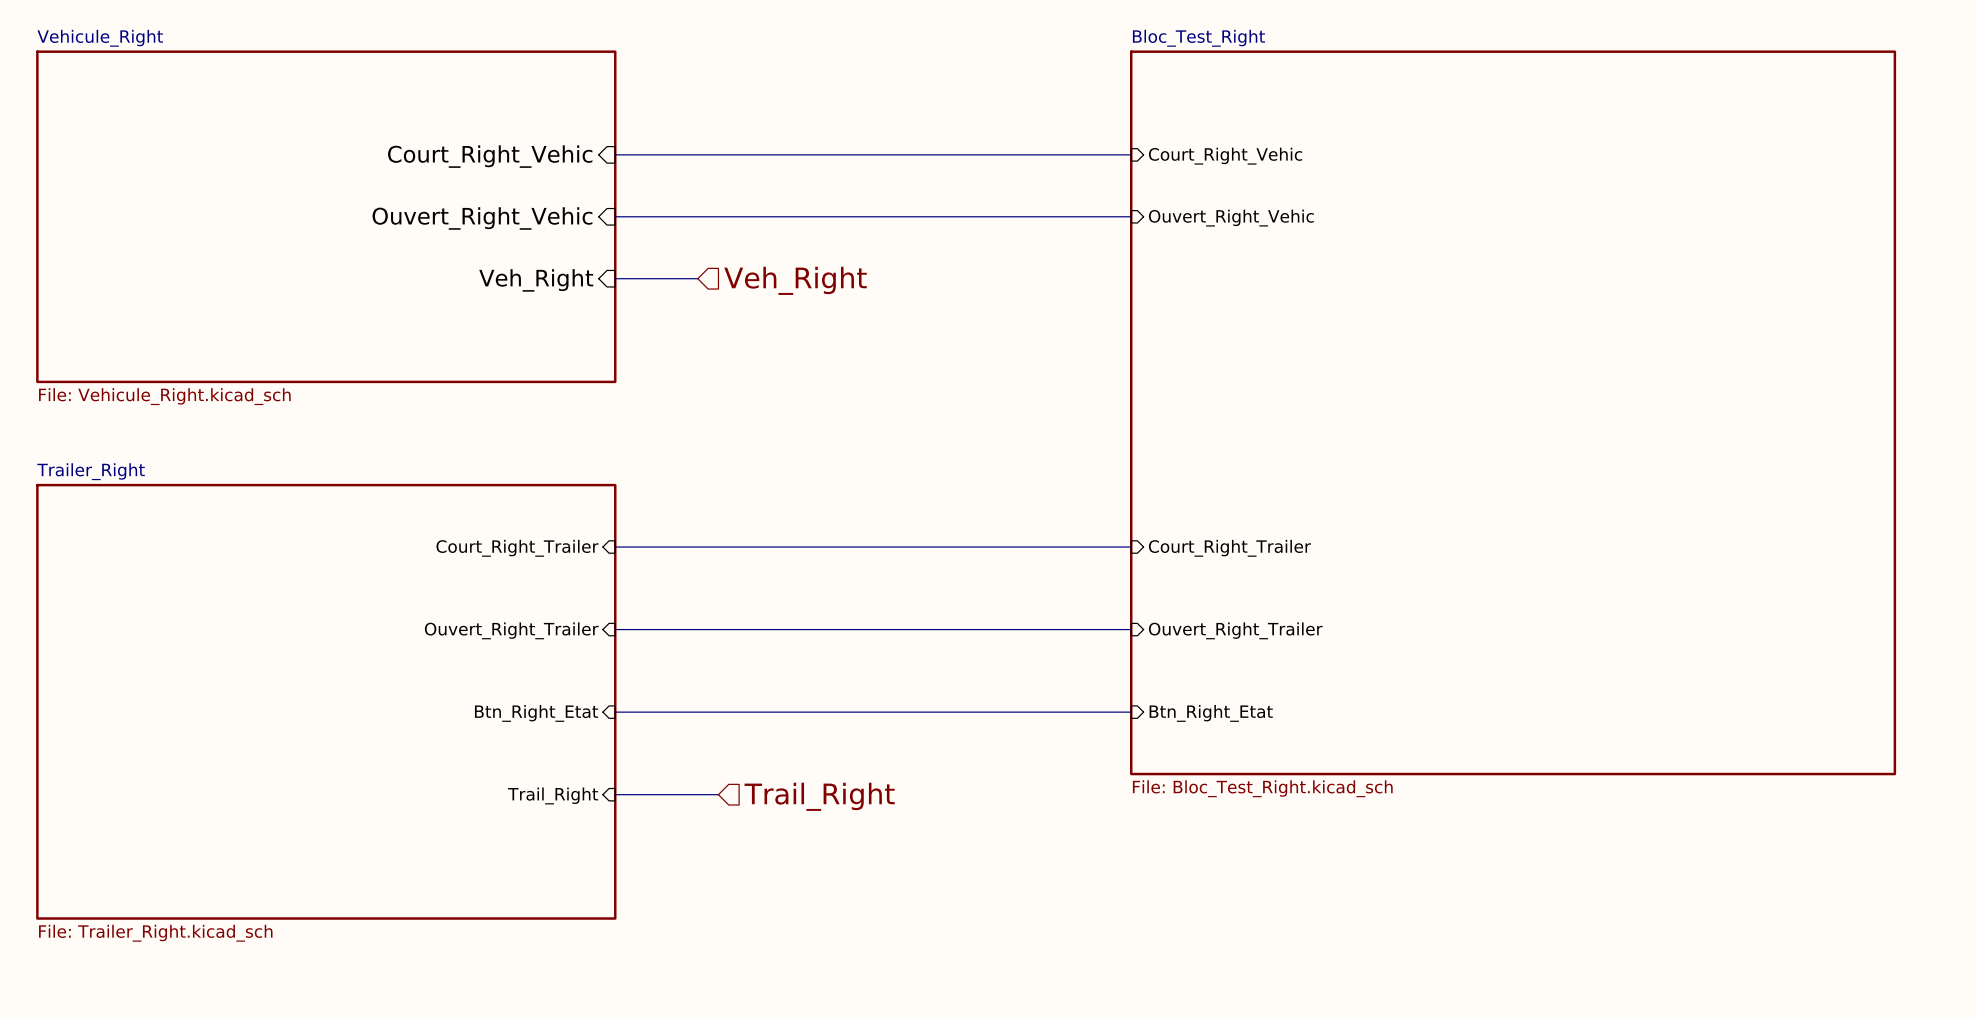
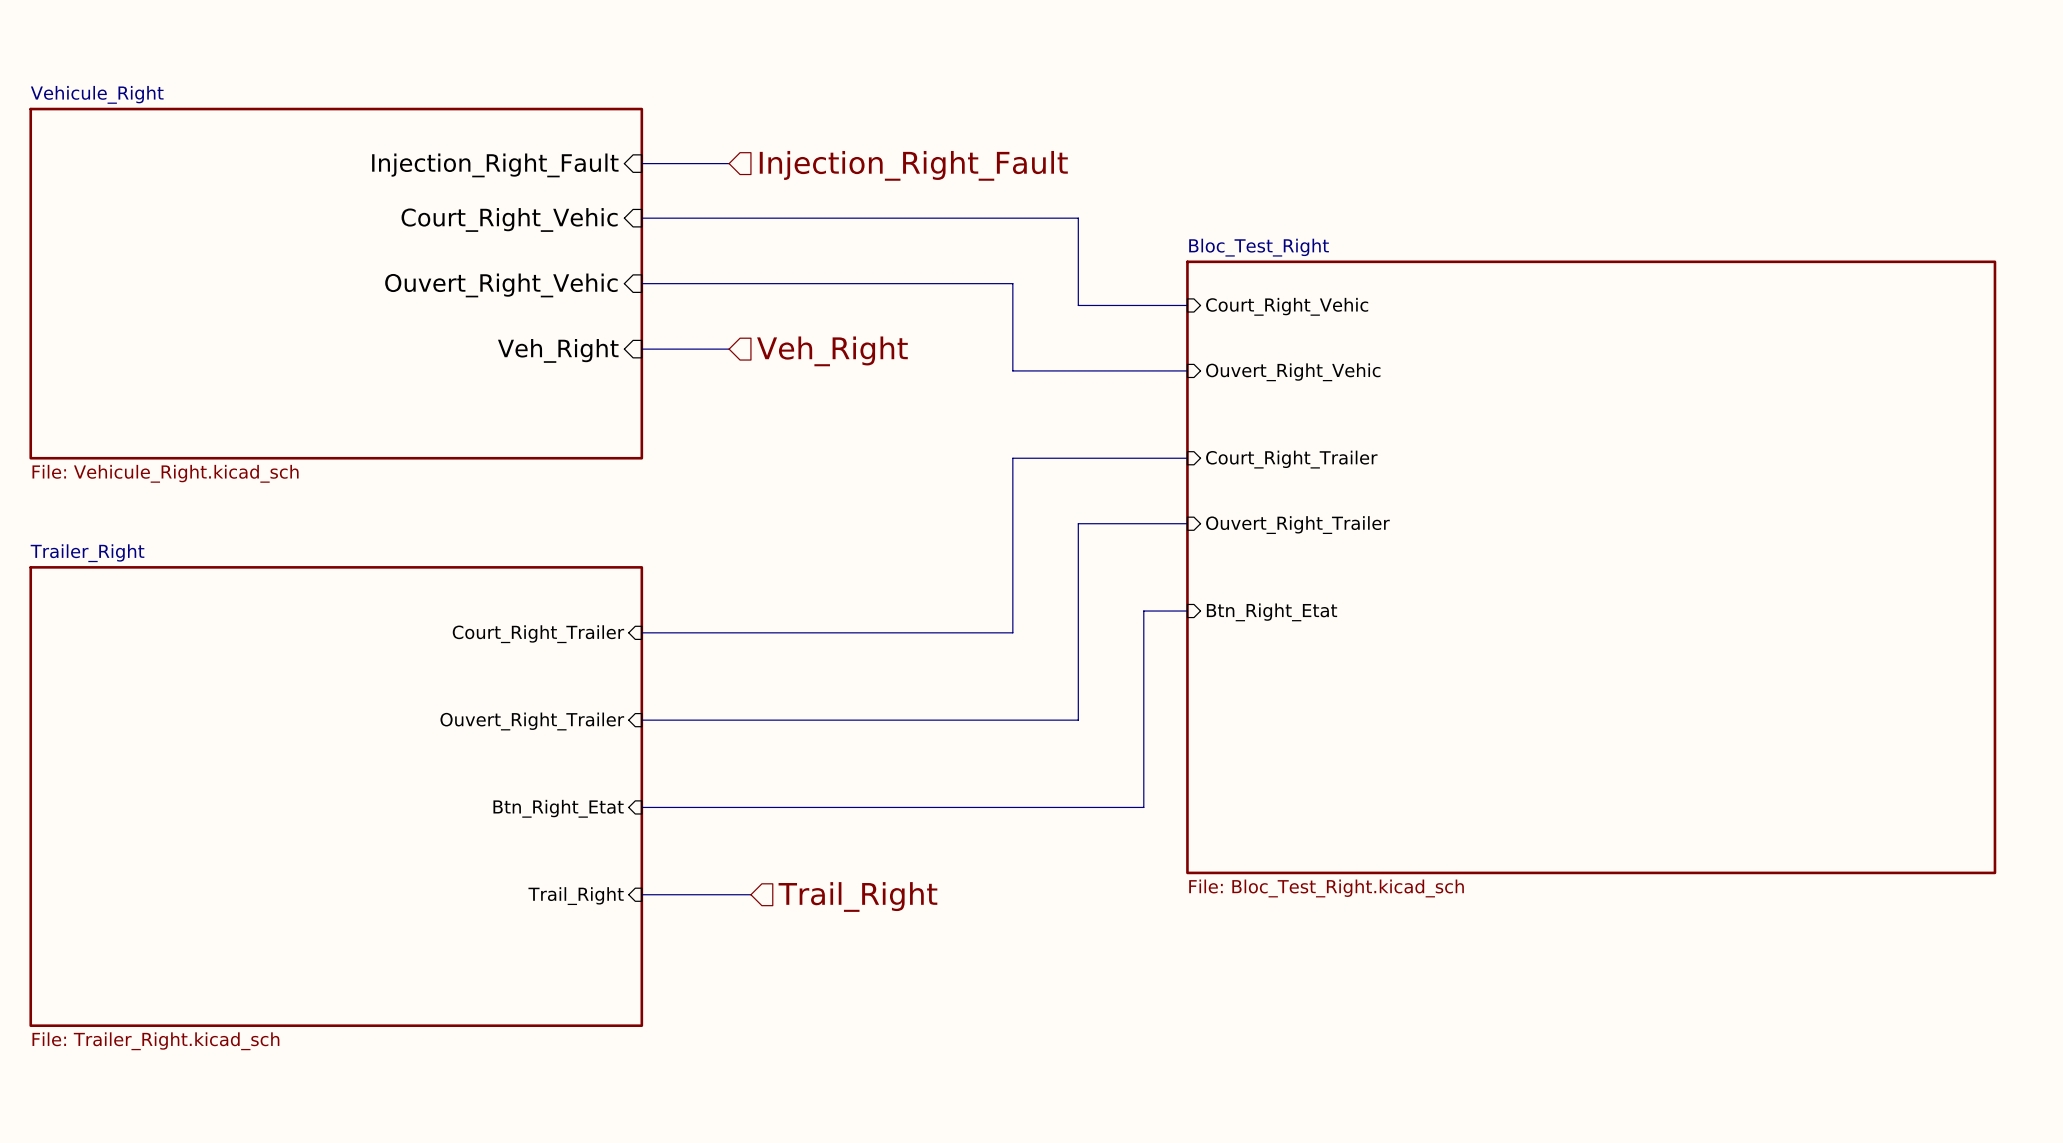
wire: none -> (641, 163) (729, 163)
sheet pin: none -> Injection_Right_Fault (495, 165)
hierarchical label: none -> Injection_Right_Fault (913, 165)
wire: (1028, 154) (1131, 154) -> (1078, 218) (1078, 305) (1187, 305)
sheet pin position: Court_Right_Vehic (1225, 156) -> Court_Right_Vehic (1287, 306)
wire: (966, 216) (1131, 216) -> (1012, 283) (1012, 370) (1187, 370)
sheet pin position: Ouvert_Right_Vehic (1231, 218) -> Ouvert_Right_Vehic (1293, 372)
sheet Bloc_Test_Right: File: Bloc_Test_Right.kicad_sch (1513, 412) -> none
sheet Bloc_Test_Right: none -> File: Bloc_Test_Right.kicad_sch (1591, 567)
wire: (966, 547) (1131, 547) -> (1012, 632) (1012, 458) (1187, 458)
sheet pin position: Court_Right_Trailer (1229, 548) -> Court_Right_Trailer (1291, 459)
wire: (1028, 629) (1131, 629) -> (1078, 720) (1078, 523) (1187, 523)
sheet pin position: Ouvert_Right_Trailer (1235, 630) -> Ouvert_Right_Trailer (1297, 525)
wire: (1089, 712) (1131, 712) -> (1143, 807) (1143, 611) (1187, 611)
sheet pin position: Btn_Right_Etat (1211, 713) -> Btn_Right_Etat (1272, 612)

